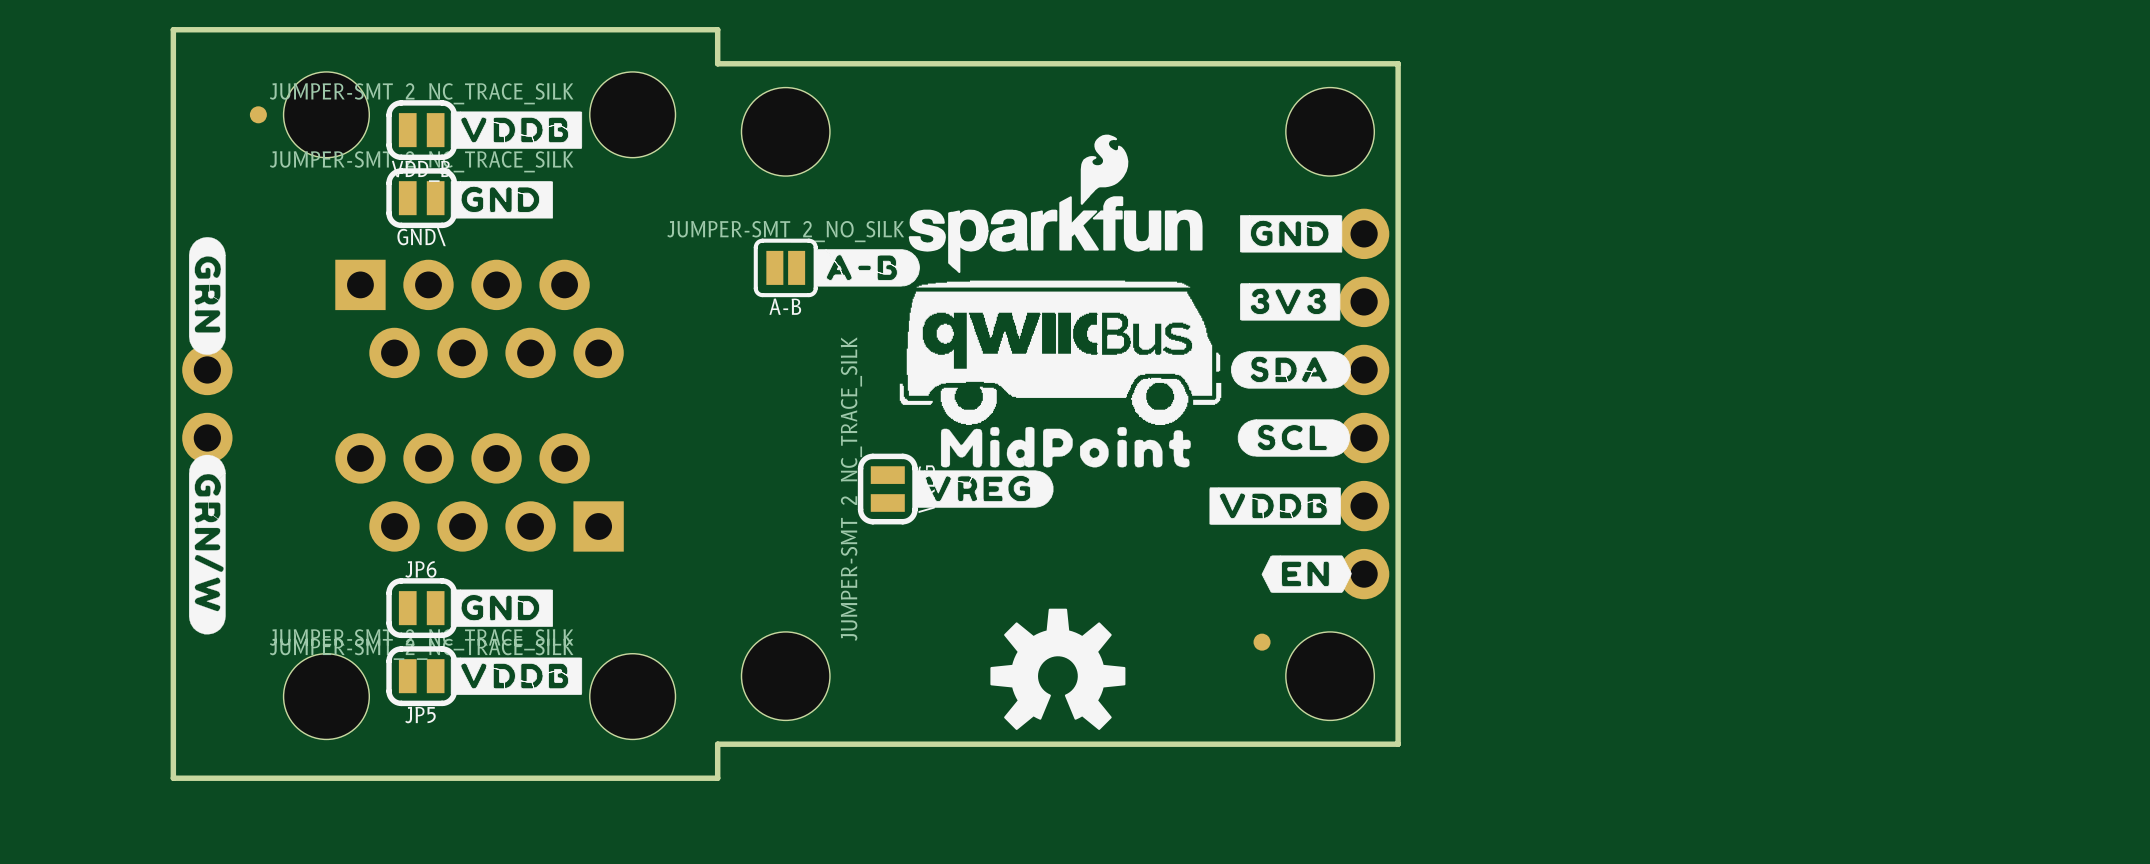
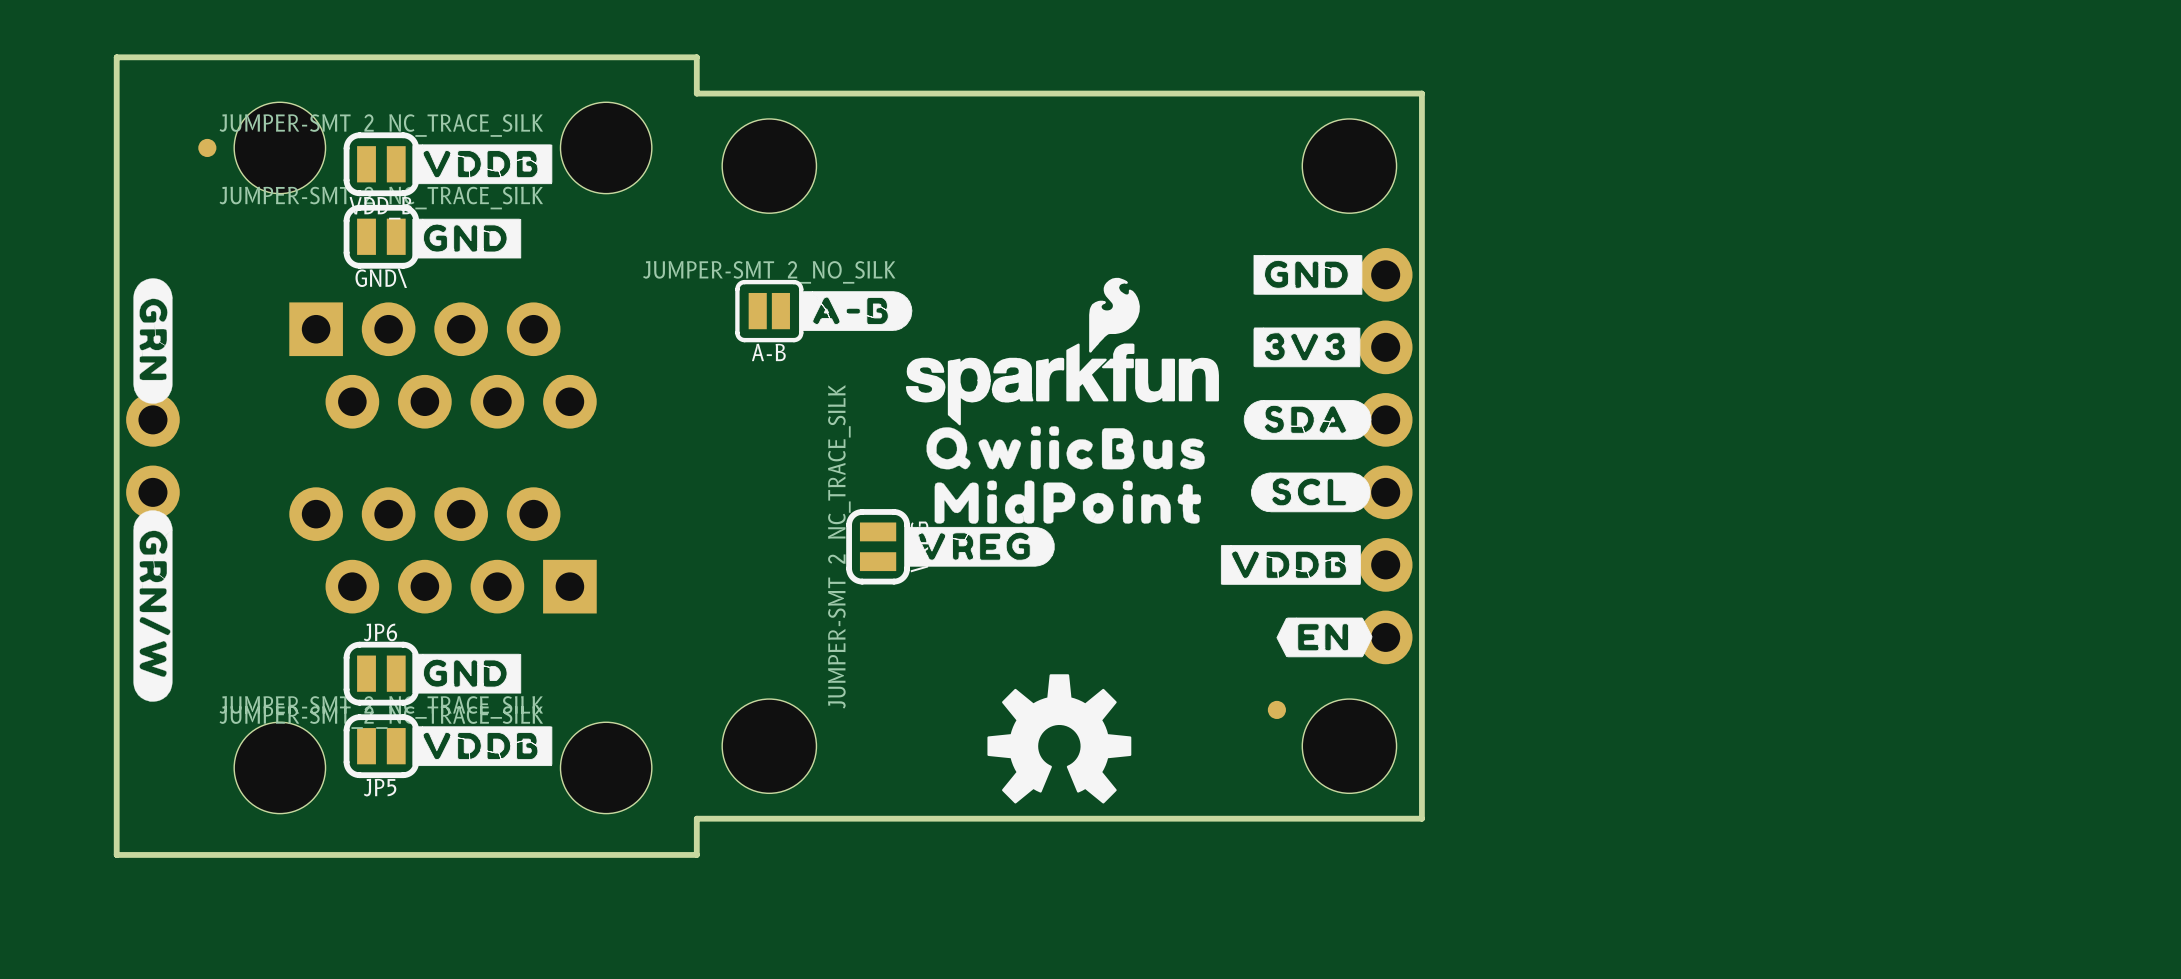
drawing position: (1055, 203) -> (1062, 351)
drawing: [899, 280, 1222, 425] -> none
drawing: none -> [926, 426, 1205, 470]

